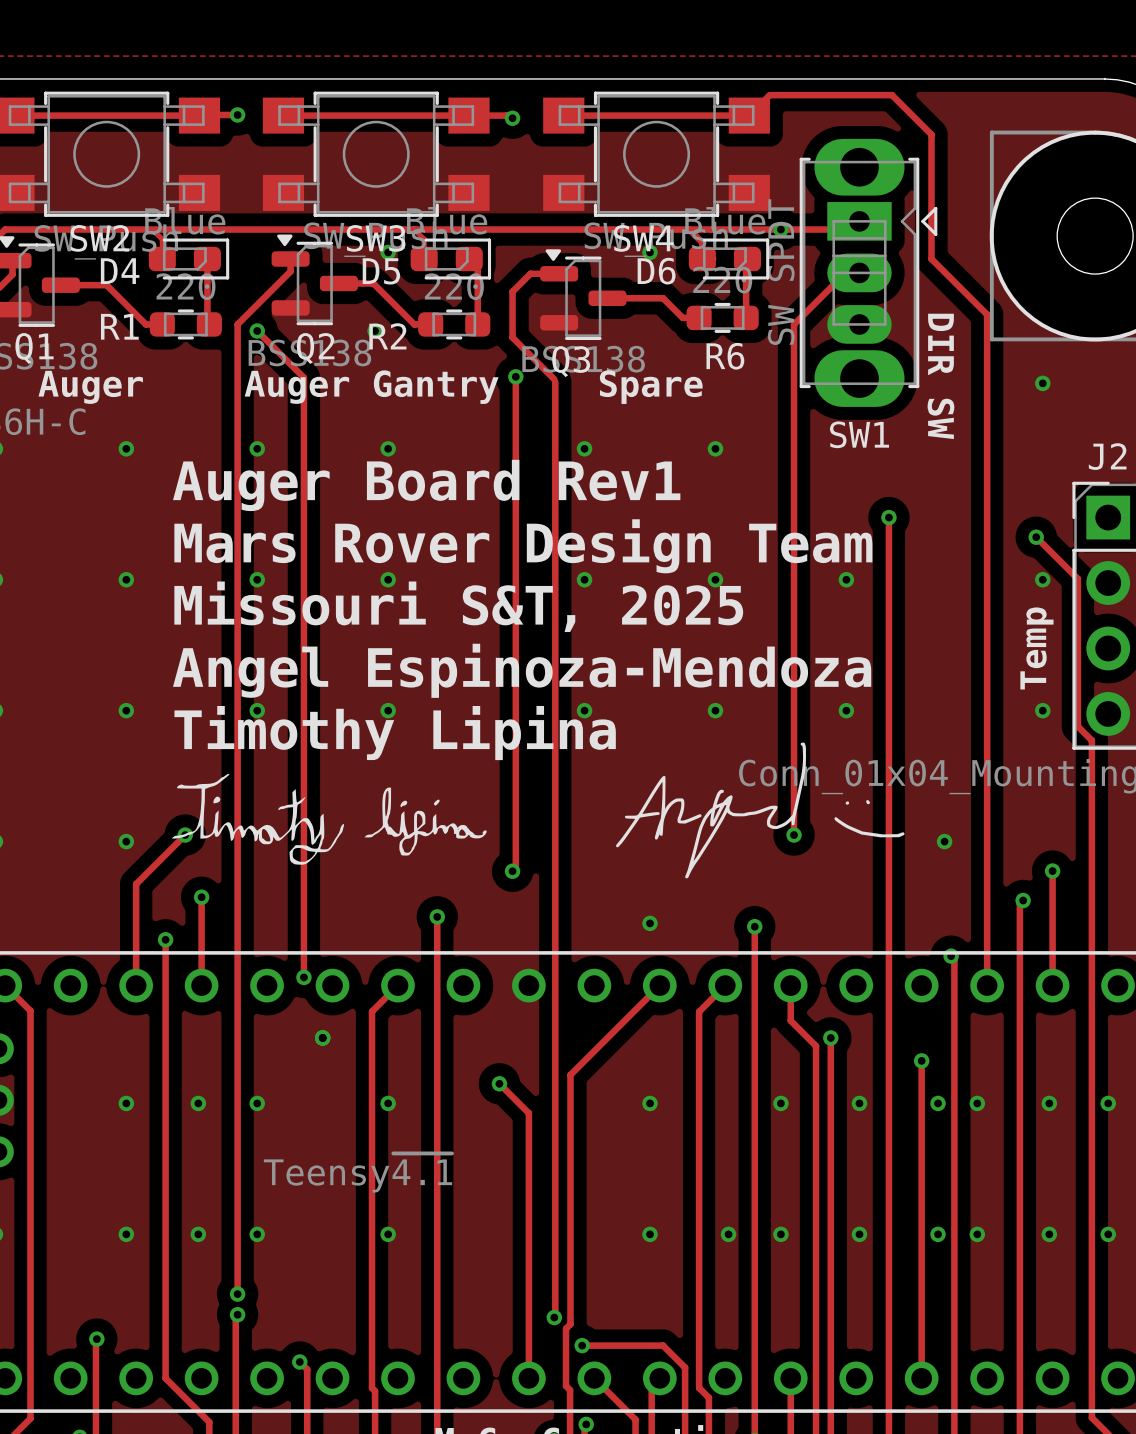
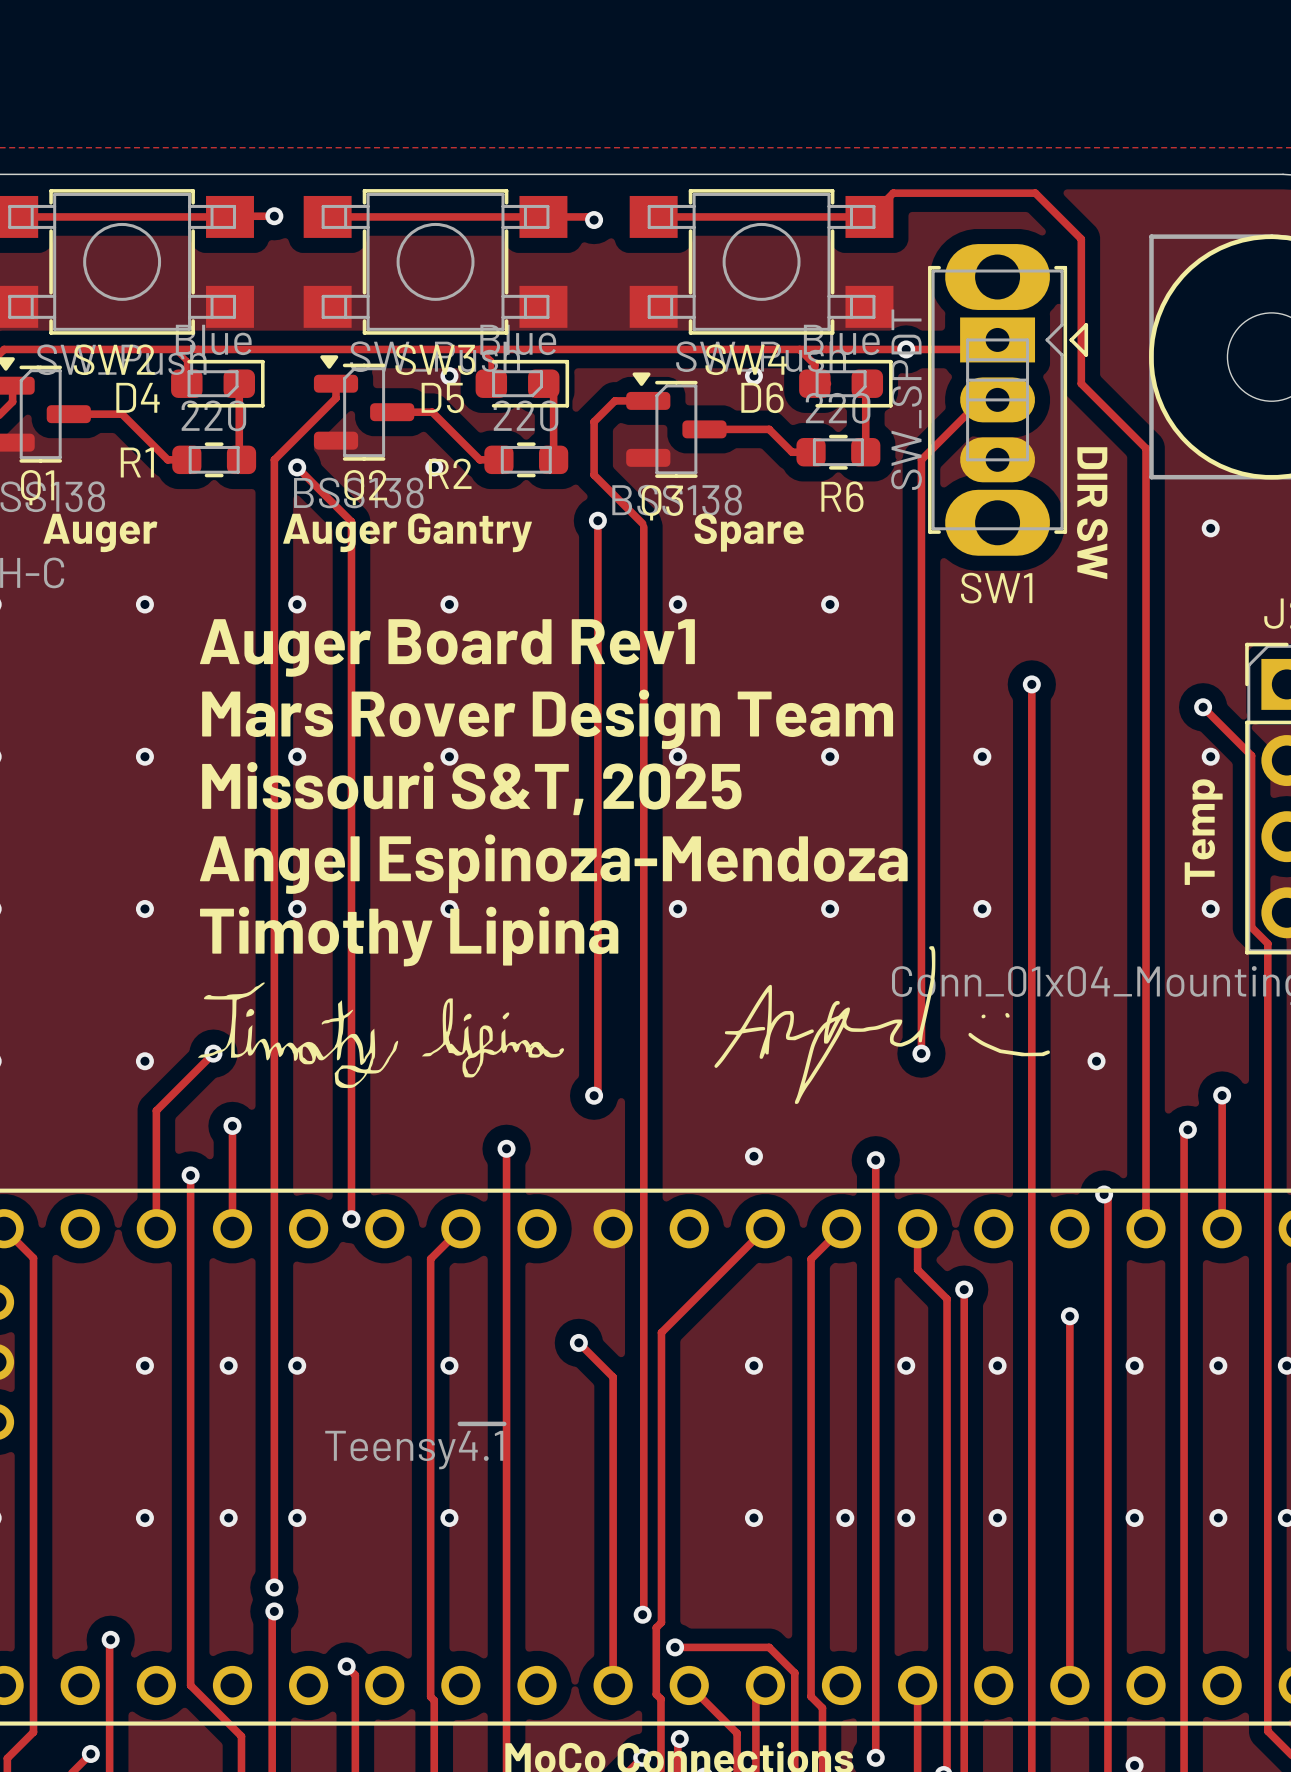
via: (322, 1037) -> none
via: (938, 1103) -> none
via: (938, 1234) -> none

